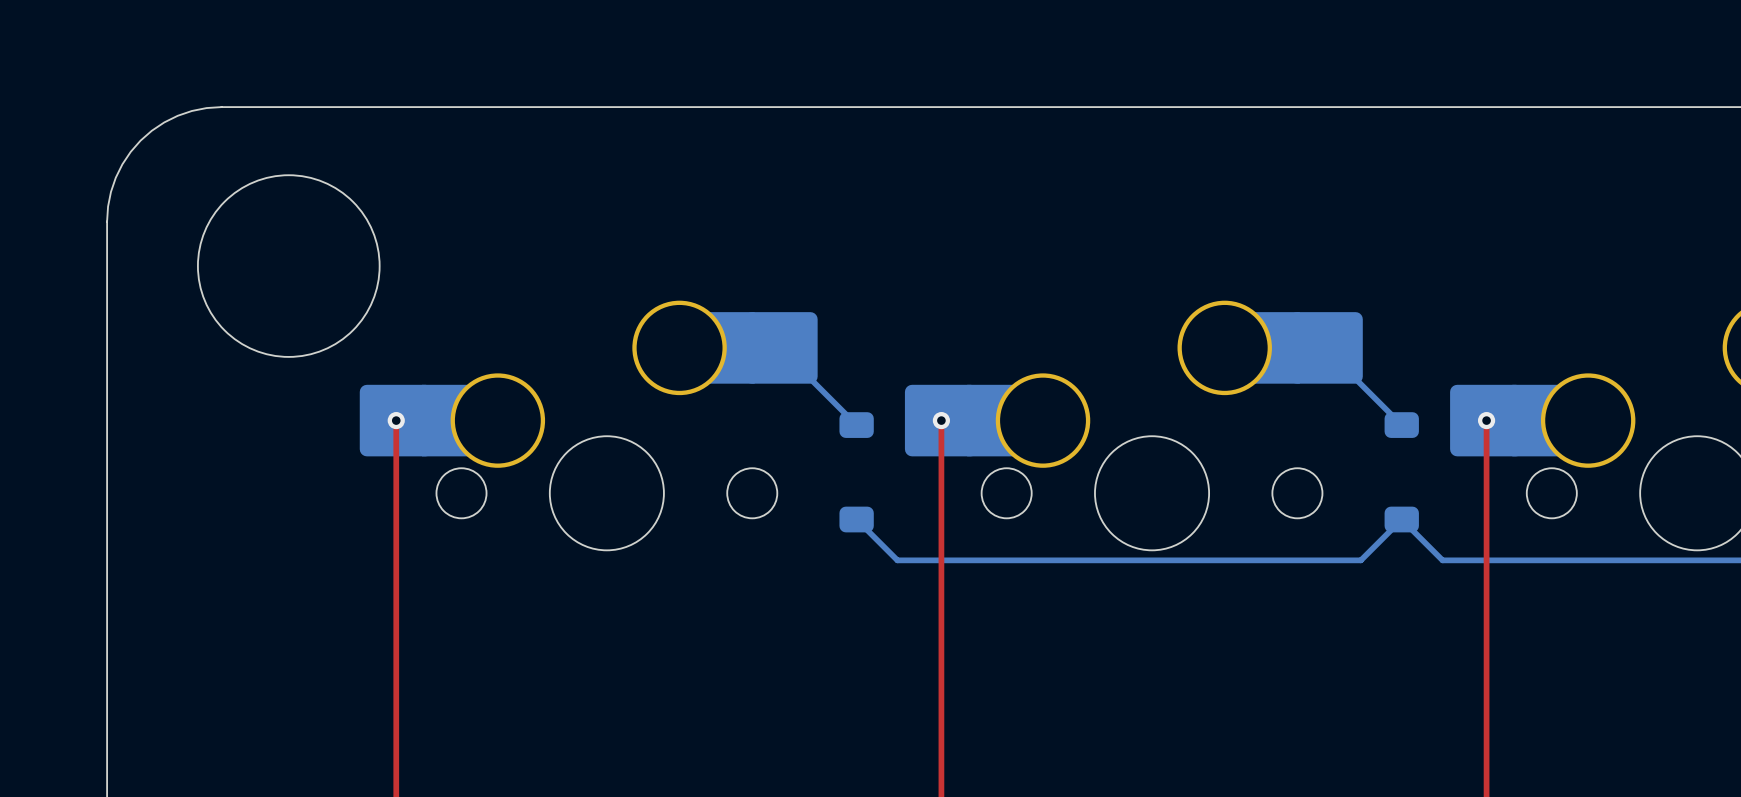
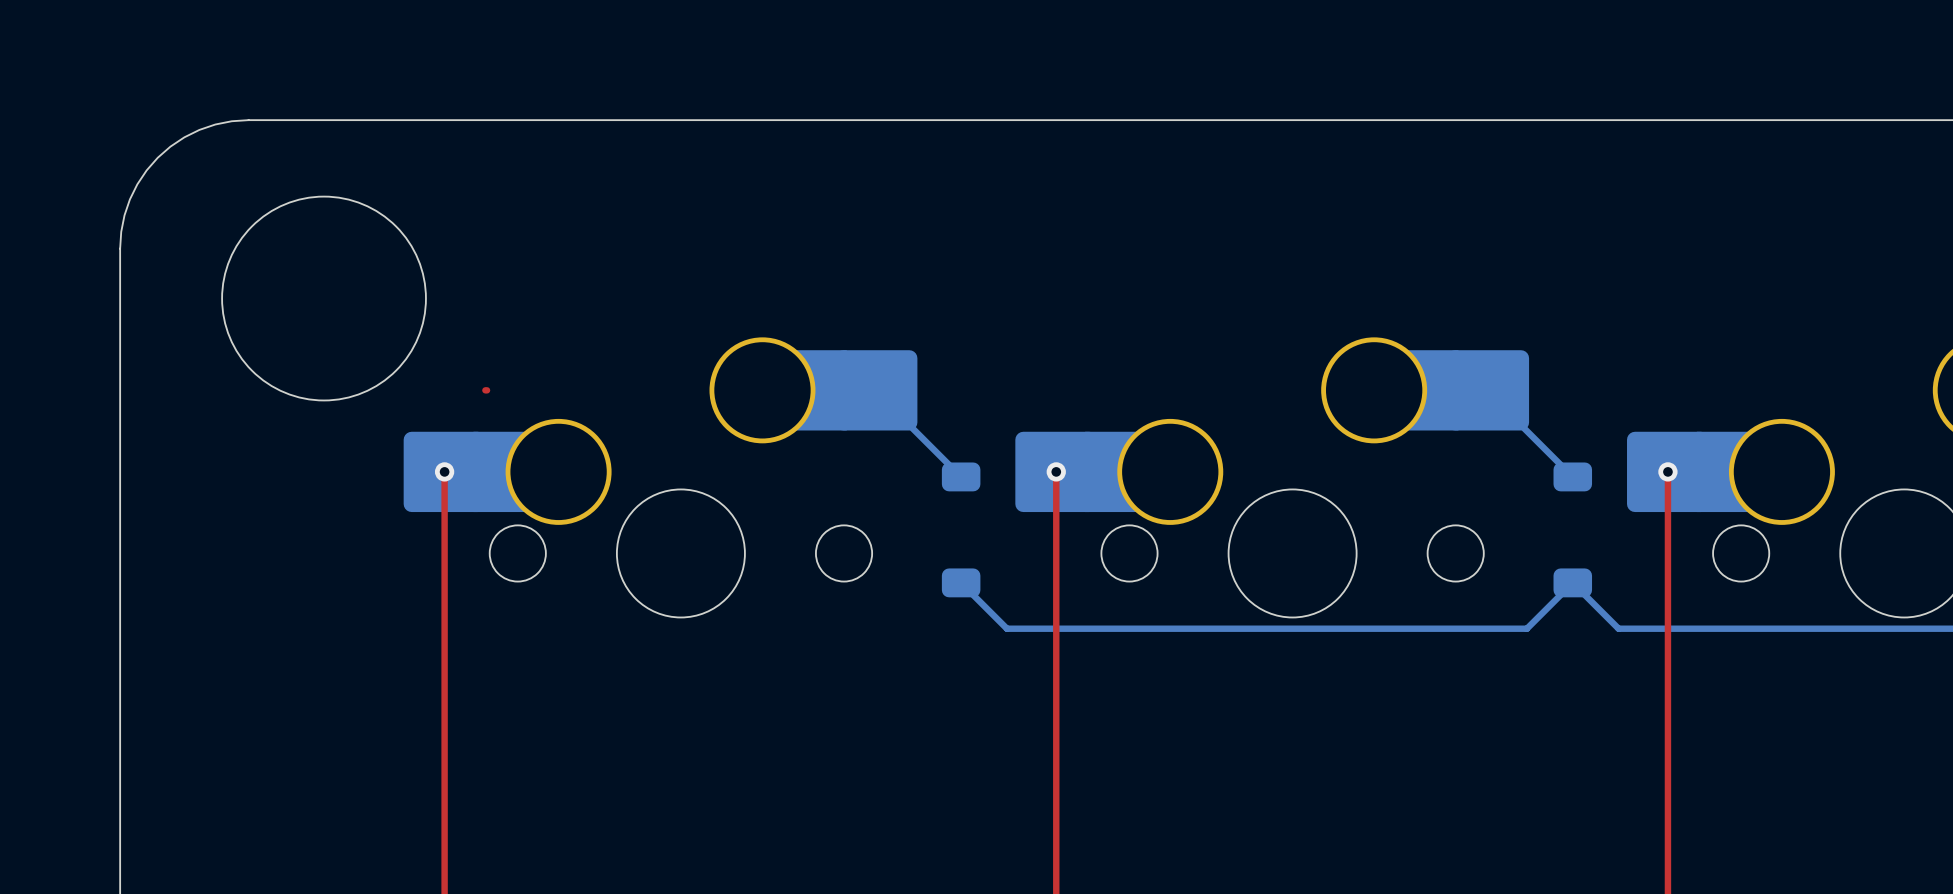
top track: none -> (485, 390) (487, 390)

